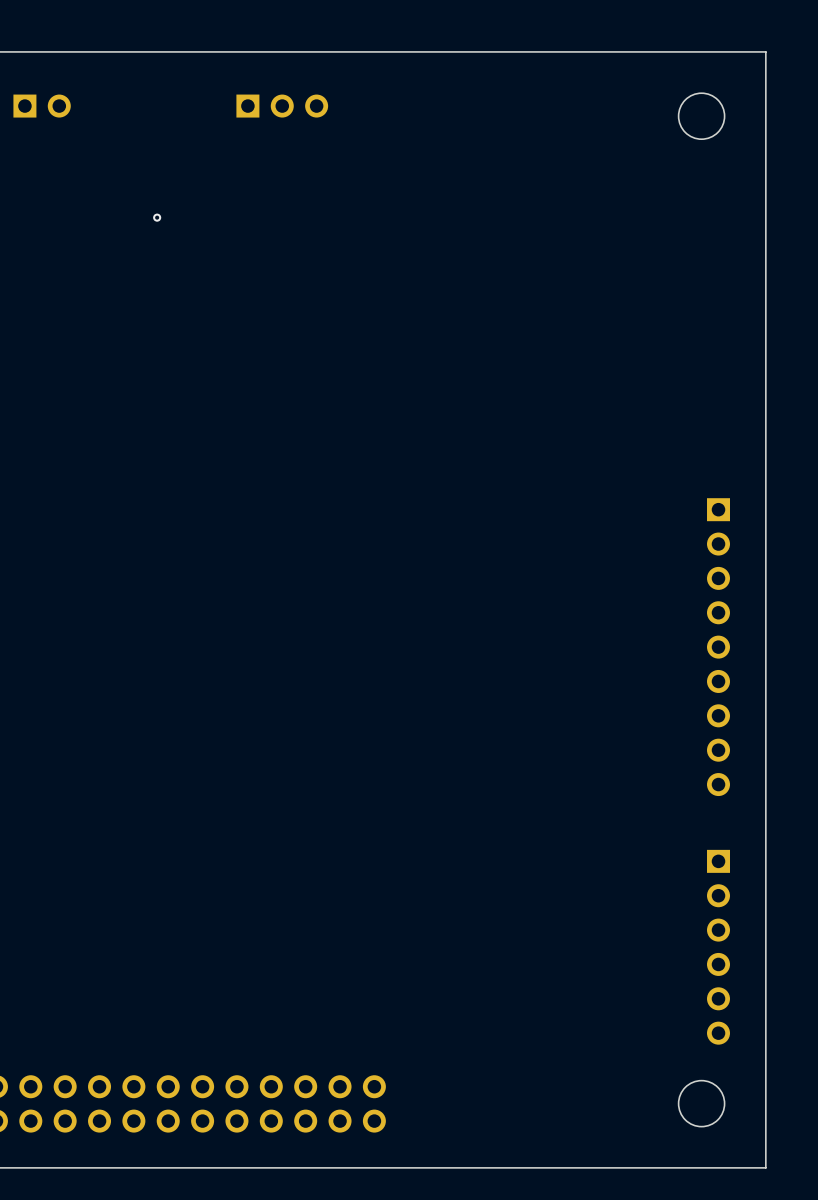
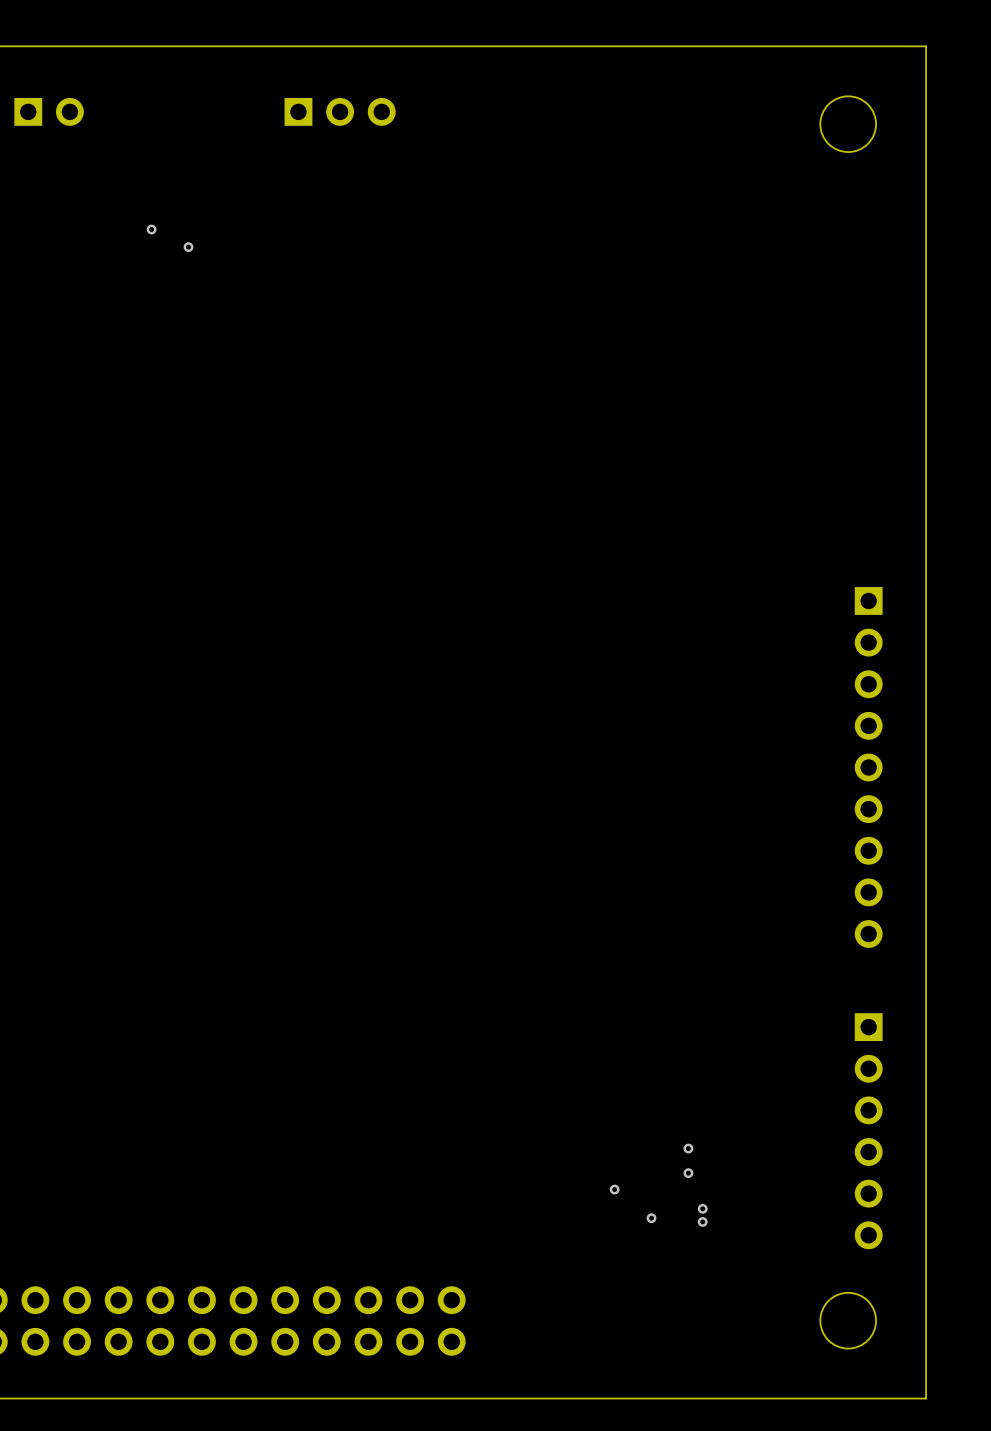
via: none -> (151, 229)
via: none -> (688, 1148)
via: none -> (688, 1173)
via: none -> (614, 1189)
via: none -> (702, 1208)
via: none -> (651, 1218)
via: none -> (702, 1221)

